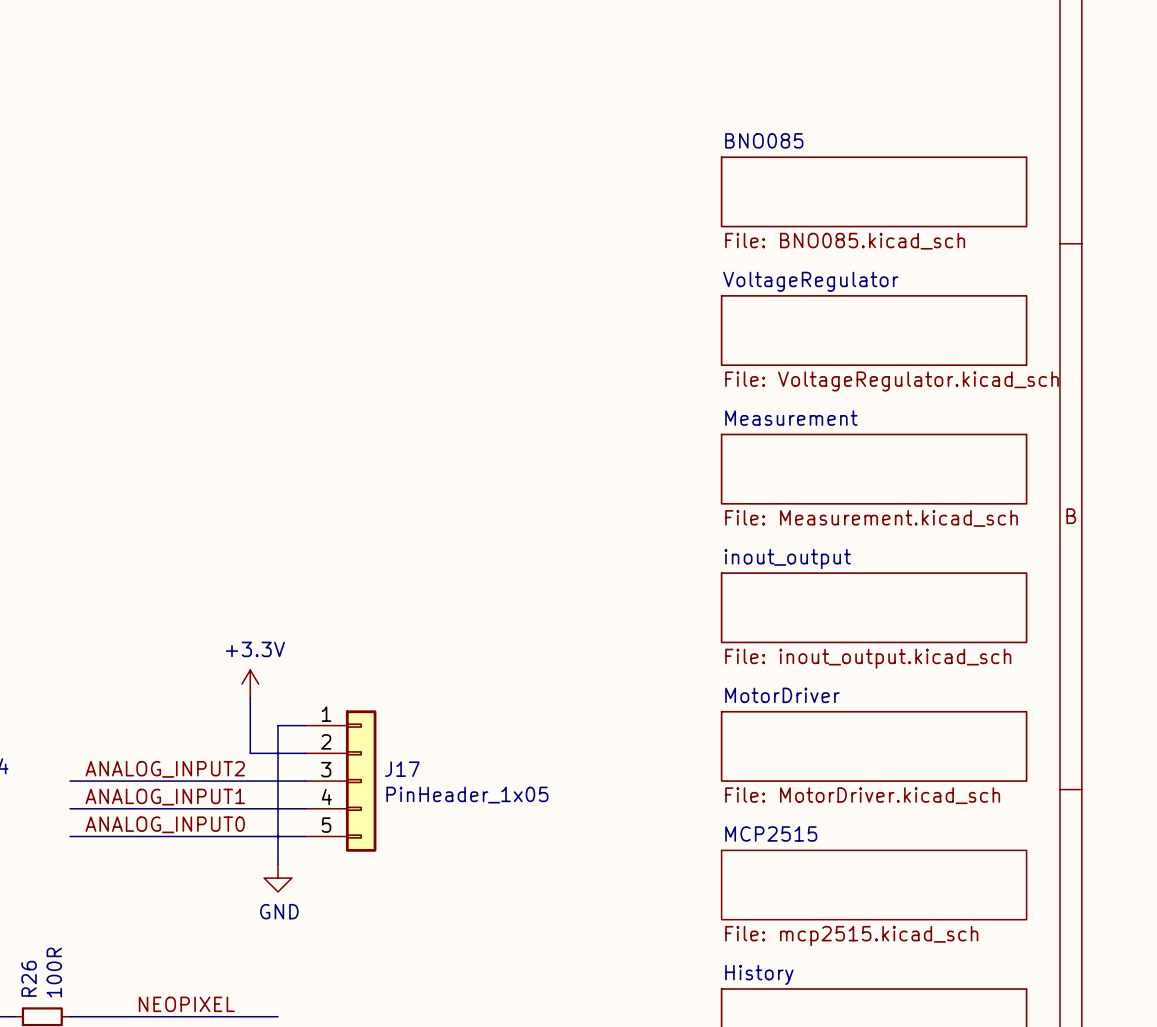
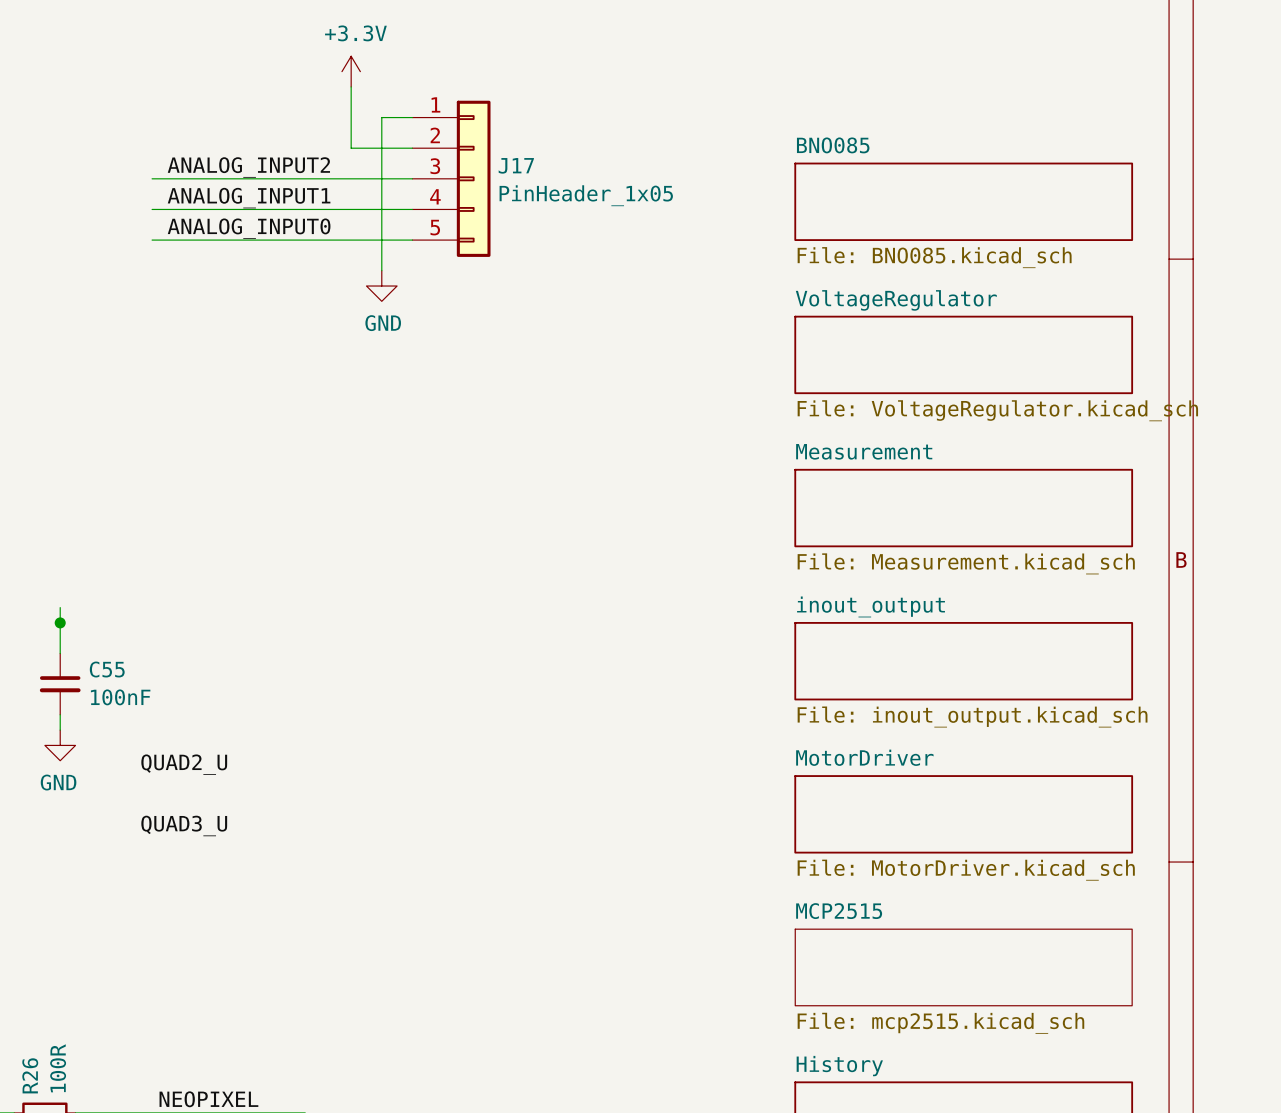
power symbol: none -> +3.3V (351, 71)
wire: none -> (351, 86) (351, 148) (412, 148)
wire: none -> (412, 117) (381, 117) (381, 270)
label: none -> ANALOG_INPUT2 (248, 167)
wire: none -> (152, 178) (412, 178)
label: none -> ANALOG_INPUT1 (249, 198)
wire: none -> (152, 209) (412, 209)
label: none -> ANALOG_INPUT0 (249, 228)
wire: none -> (152, 240) (412, 240)
power symbol: none -> GND (381, 286)
wire: none -> (60, 607) (60, 653)
junction: none -> (60, 622)
C55: none -> 100nF (60, 684)
wire: none -> (60, 714) (60, 730)
power symbol: none -> GND (60, 745)
power symbol: +3.3V (250, 684) -> none
wire: (250, 697) (250, 753) (305, 753) -> none
label: none -> QUAD2_U (184, 764)
wire: (305, 725) (278, 725) (278, 864) -> none
label: none -> QUAD3_U (184, 825)
label: ANALOG_INPUT2 (165, 769) -> none
wire: (70, 781) (305, 781) -> none
J17 position: (341, 781) -> (451, 178)
label: ANALOG_INPUT1 (165, 797) -> none
wire: (70, 808) (305, 808) -> none
label: ANALOG_INPUT0 (165, 824) -> none
wire: (70, 836) (305, 836) -> none
power symbol: GND (278, 878) -> none

